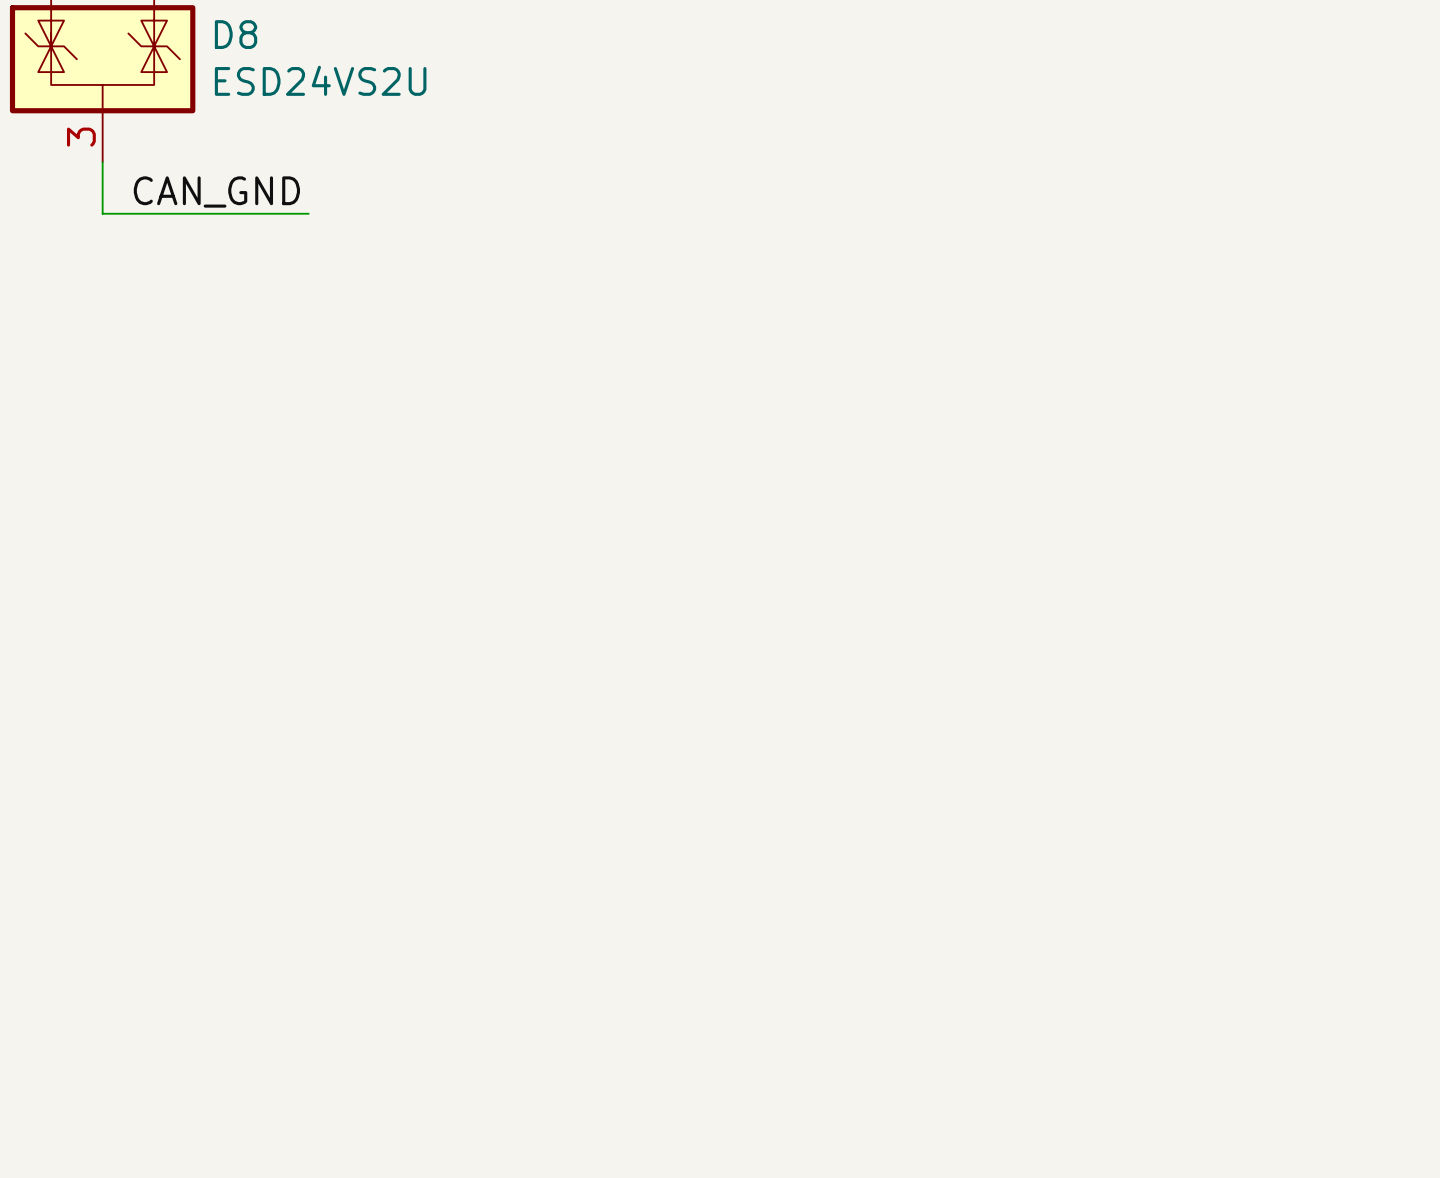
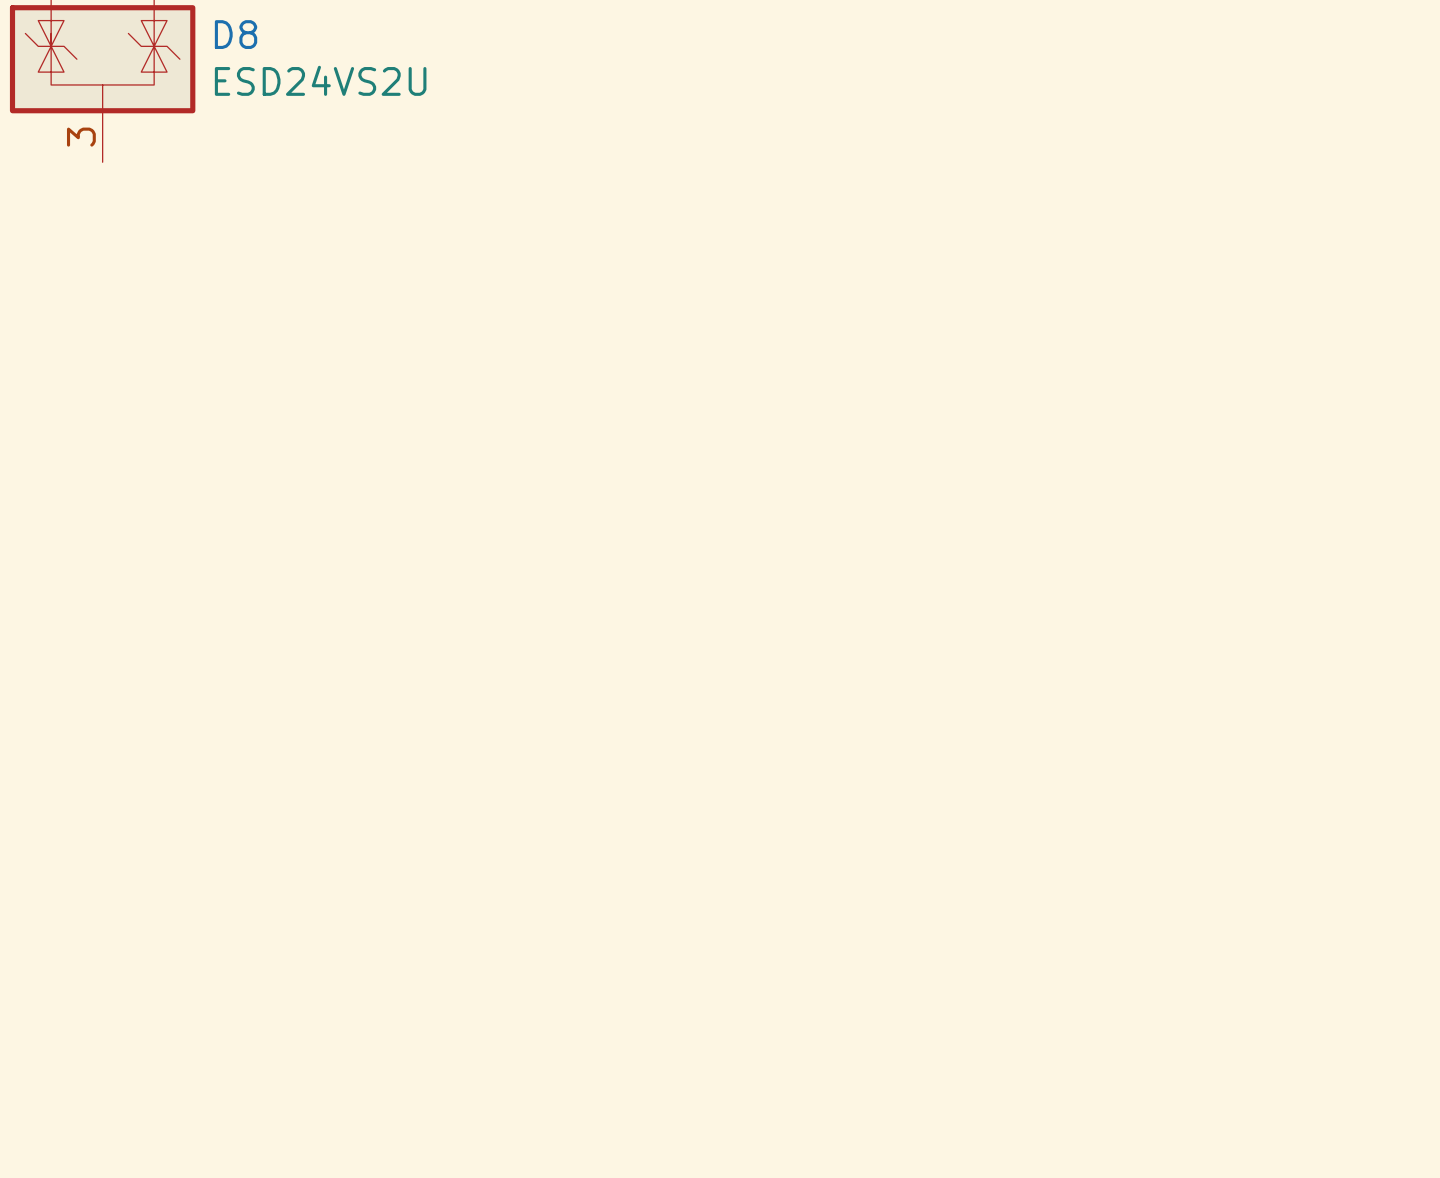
wire: (102, 162) (102, 213) (308, 213) -> none
label: CAN_GND (216, 191) -> none

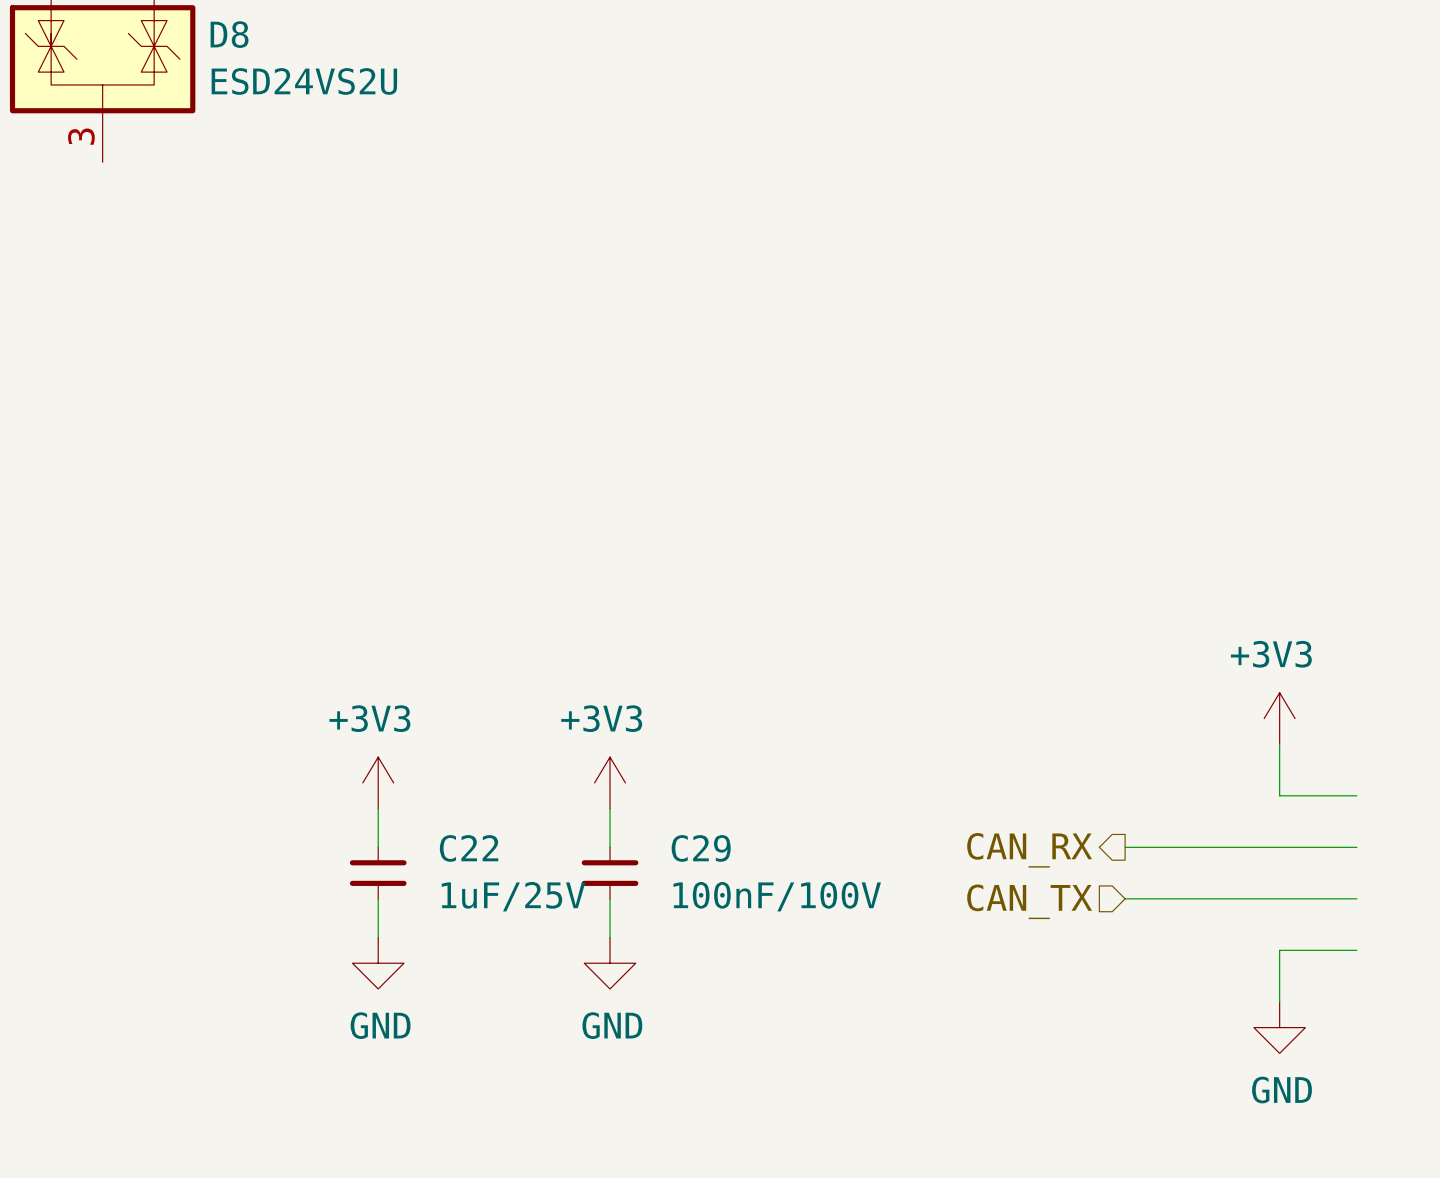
power symbol: none -> +3V3 (1279, 718)
wire: none -> (1279, 744) (1279, 795) (1356, 795)
power symbol: none -> +3V3 (378, 782)
power symbol: none -> +3V3 (610, 782)
wire: none -> (378, 808) (378, 847)
wire: none -> (610, 808) (610, 847)
hierarchical label: none -> CAN_RX (1029, 850)
wire: none -> (1125, 847) (1356, 847)
C22: none -> 1uF/25V (378, 873)
C29: none -> 100nF/100V (610, 873)
wire: none -> (378, 898) (378, 937)
wire: none -> (610, 898) (610, 937)
wire: none -> (1125, 898) (1356, 898)
hierarchical label: none -> CAN_TX (1029, 901)
wire: none -> (1356, 950) (1279, 950) (1279, 1001)
power symbol: none -> GND (378, 963)
power symbol: none -> GND (610, 963)
power symbol: none -> GND (1279, 1027)

